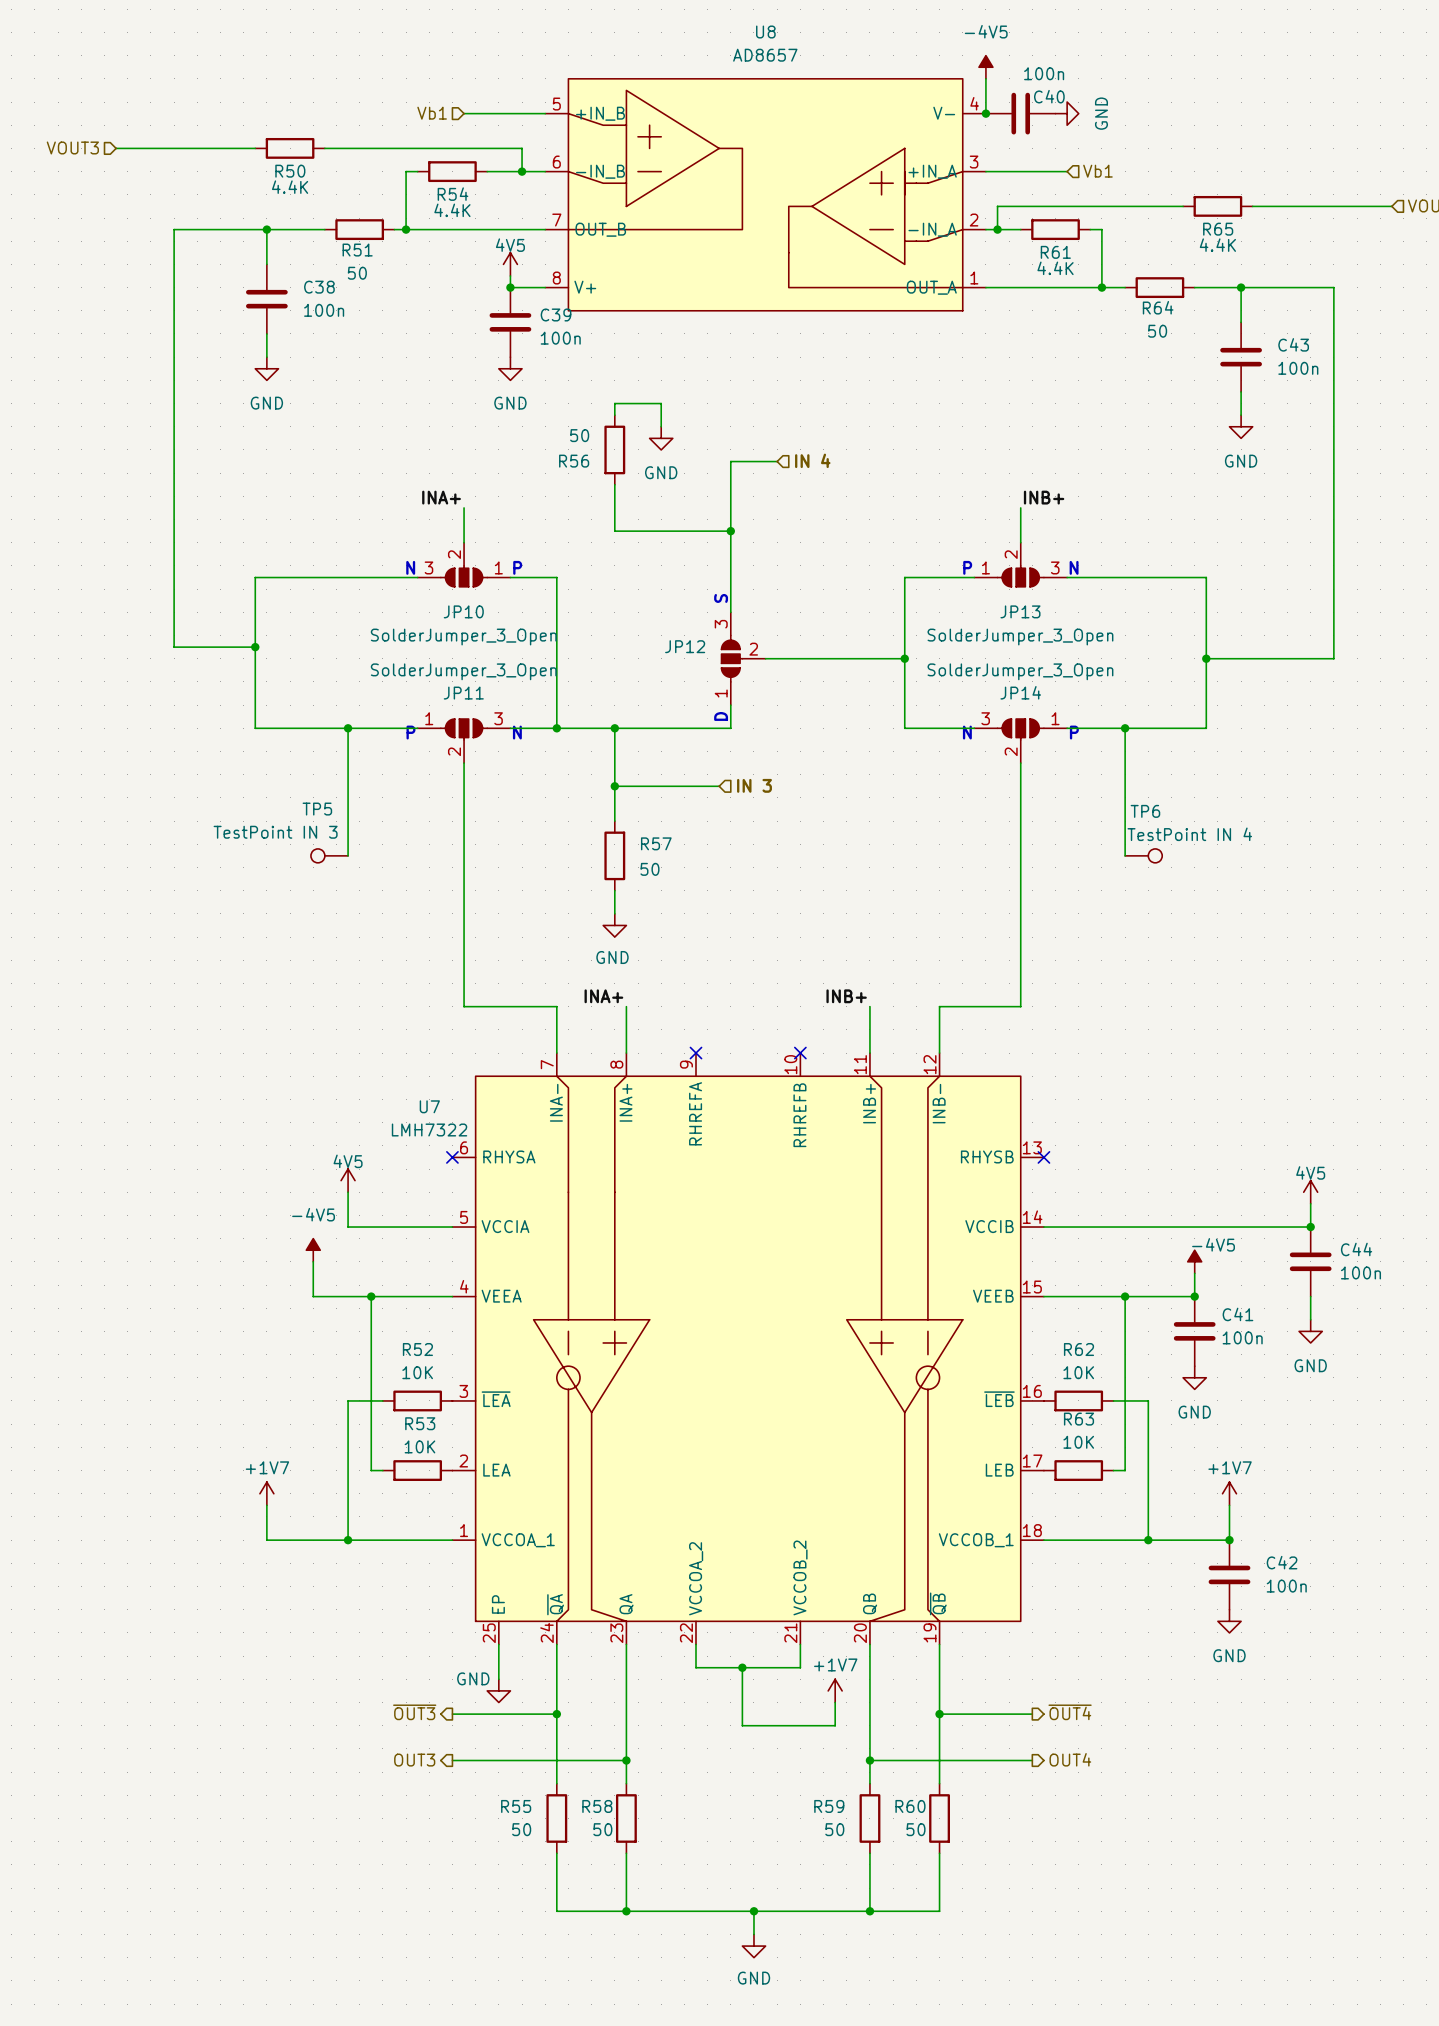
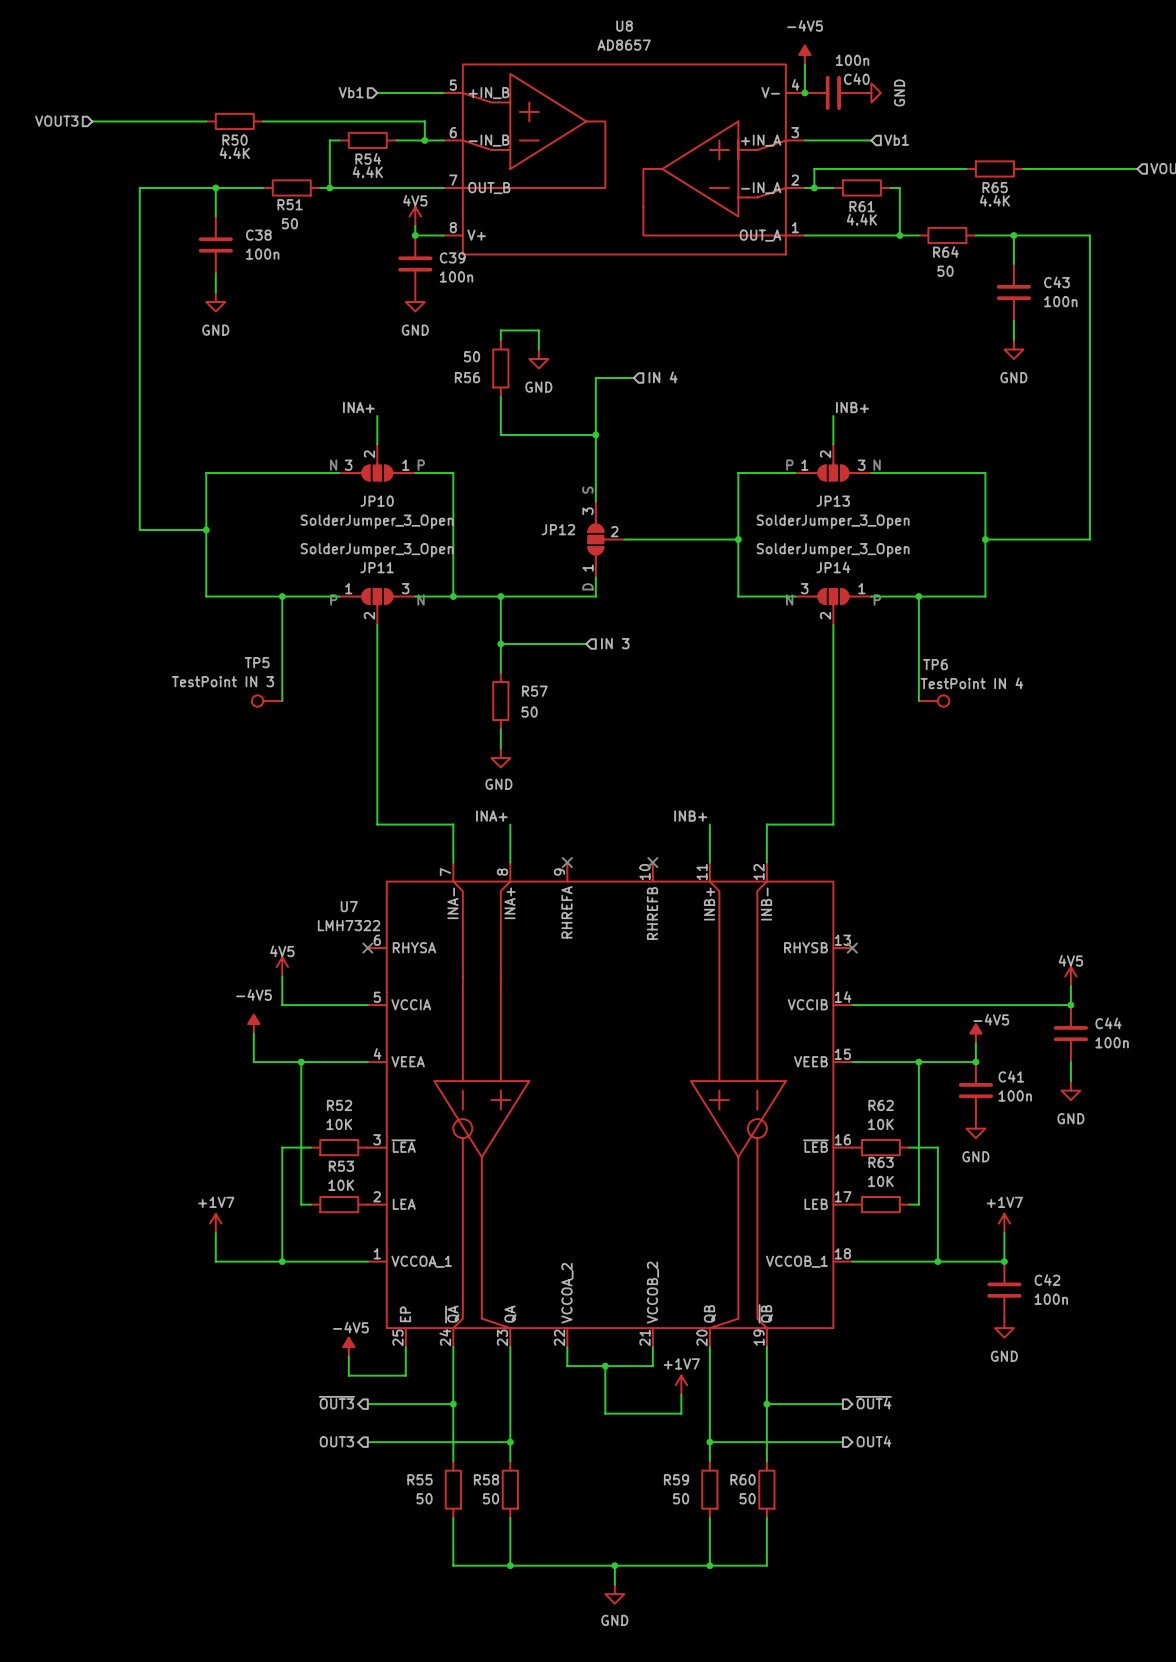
power symbol: none -> -4V5 (348, 1347)
wire: none -> (348, 1356) (348, 1375) (405, 1375)
power symbol: GND (498, 1690) -> none

